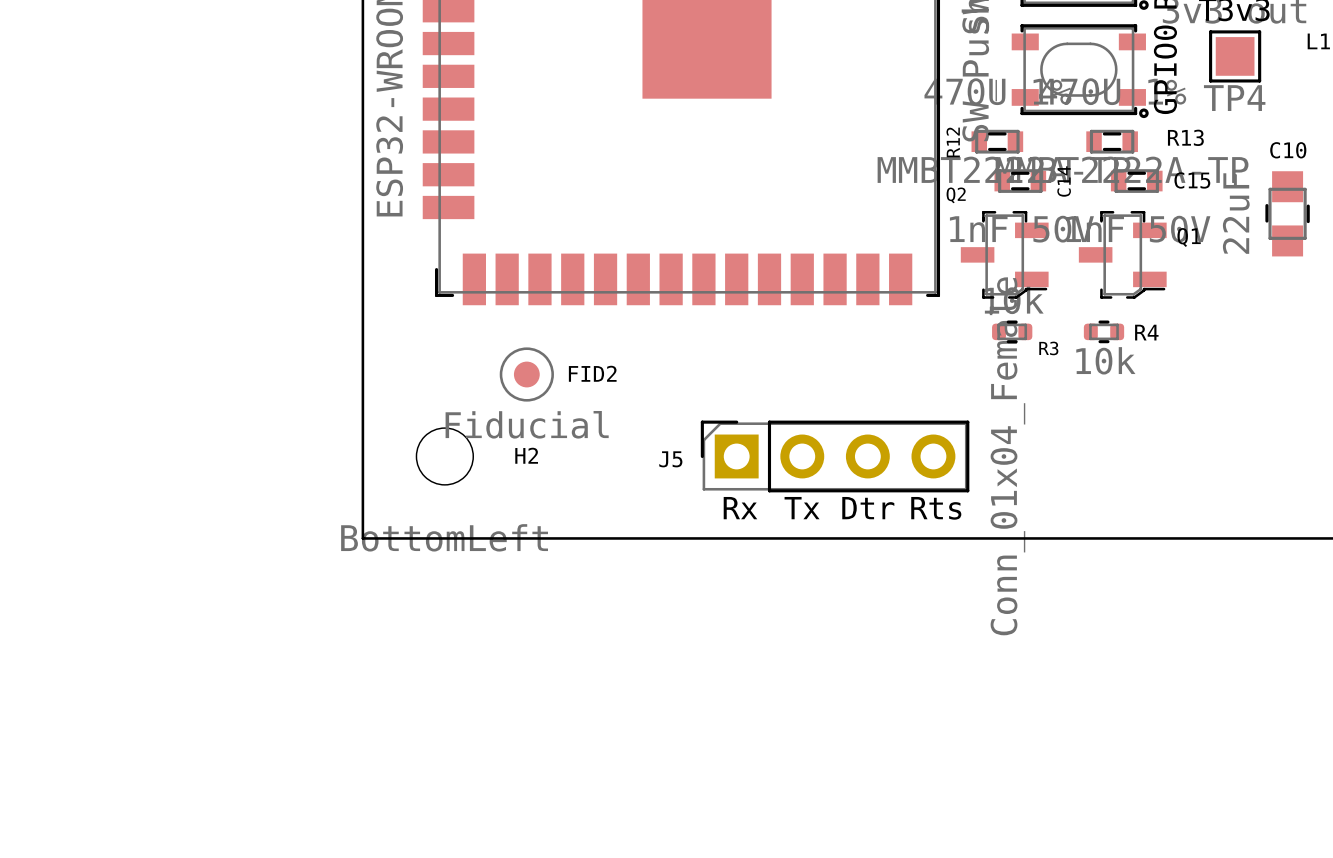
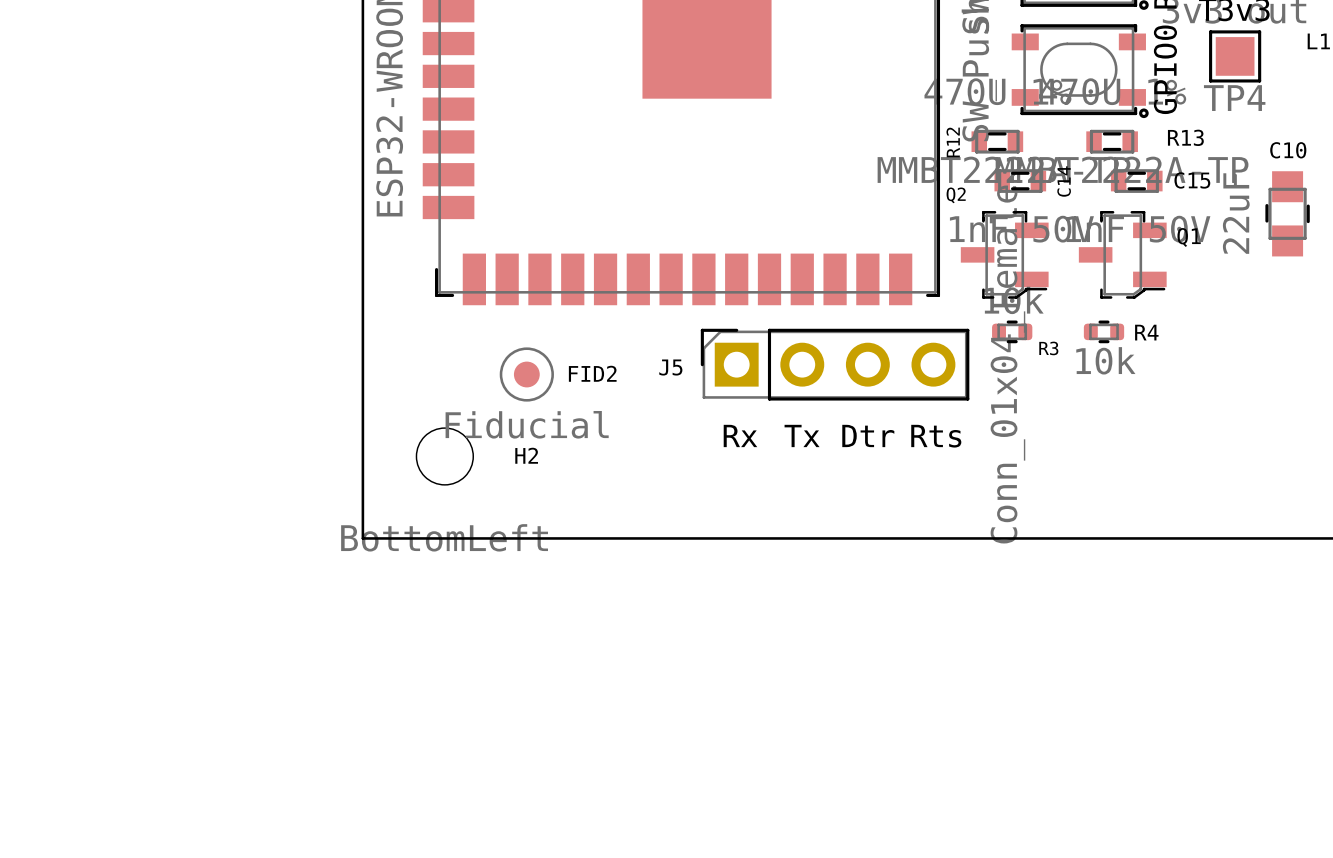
J5 position: (835, 456) -> (835, 364)
text position: Rx (740, 508) -> Rx (740, 435)
text position: Tx (802, 508) -> Tx (802, 435)
text position: Dtr (868, 508) -> Dtr (868, 435)
text position: Rts (936, 508) -> Rts (936, 436)

